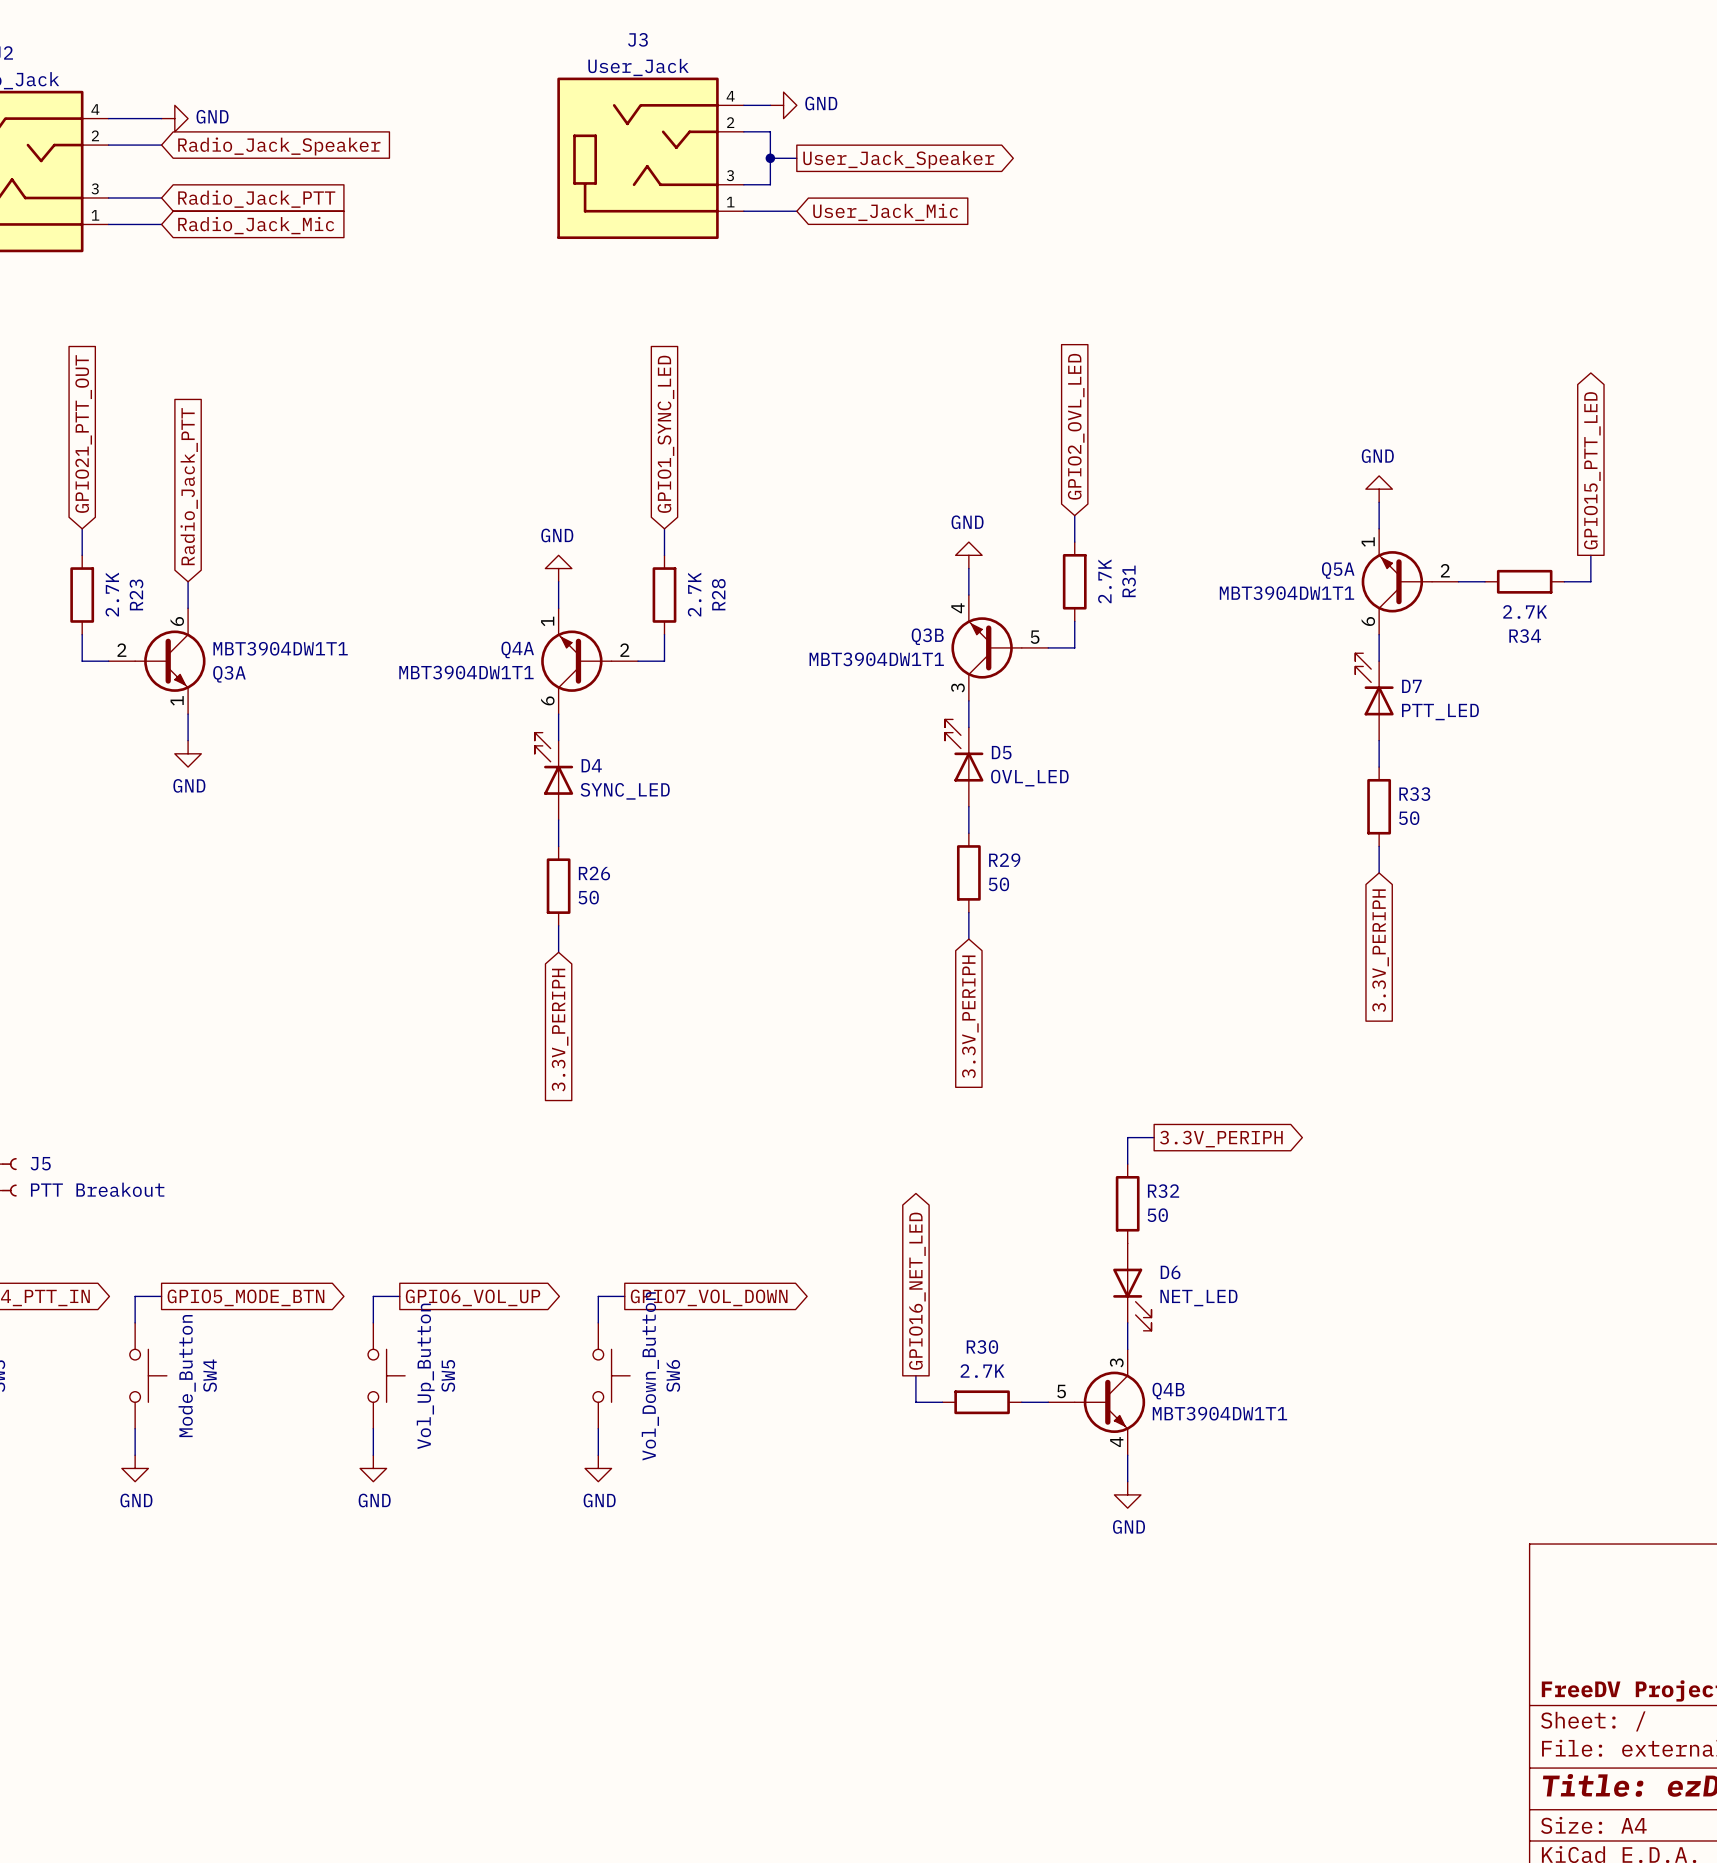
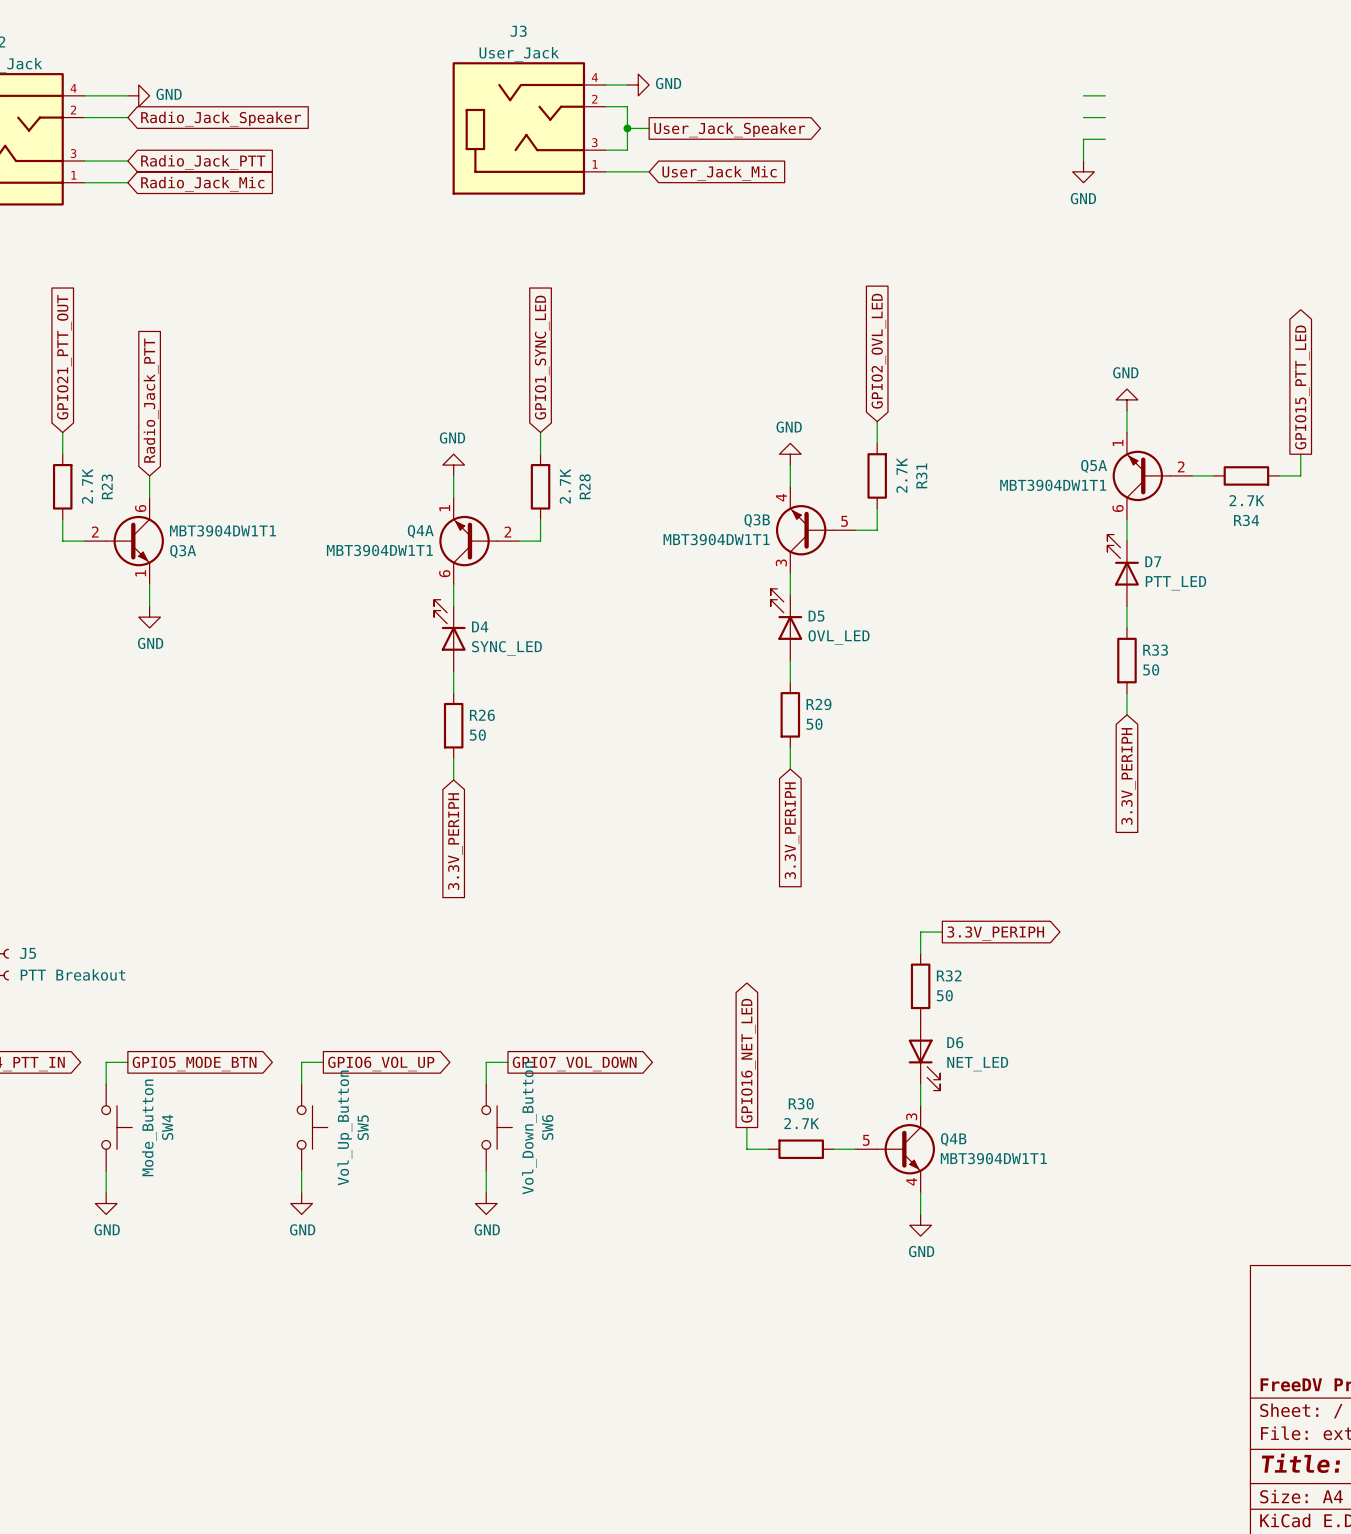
wire: none -> (1083, 95) (1105, 95)
wire: none -> (1083, 117) (1105, 117)
wire: none -> (1105, 139) (1083, 139) (1083, 161)
power symbol: none -> GND (1083, 171)

